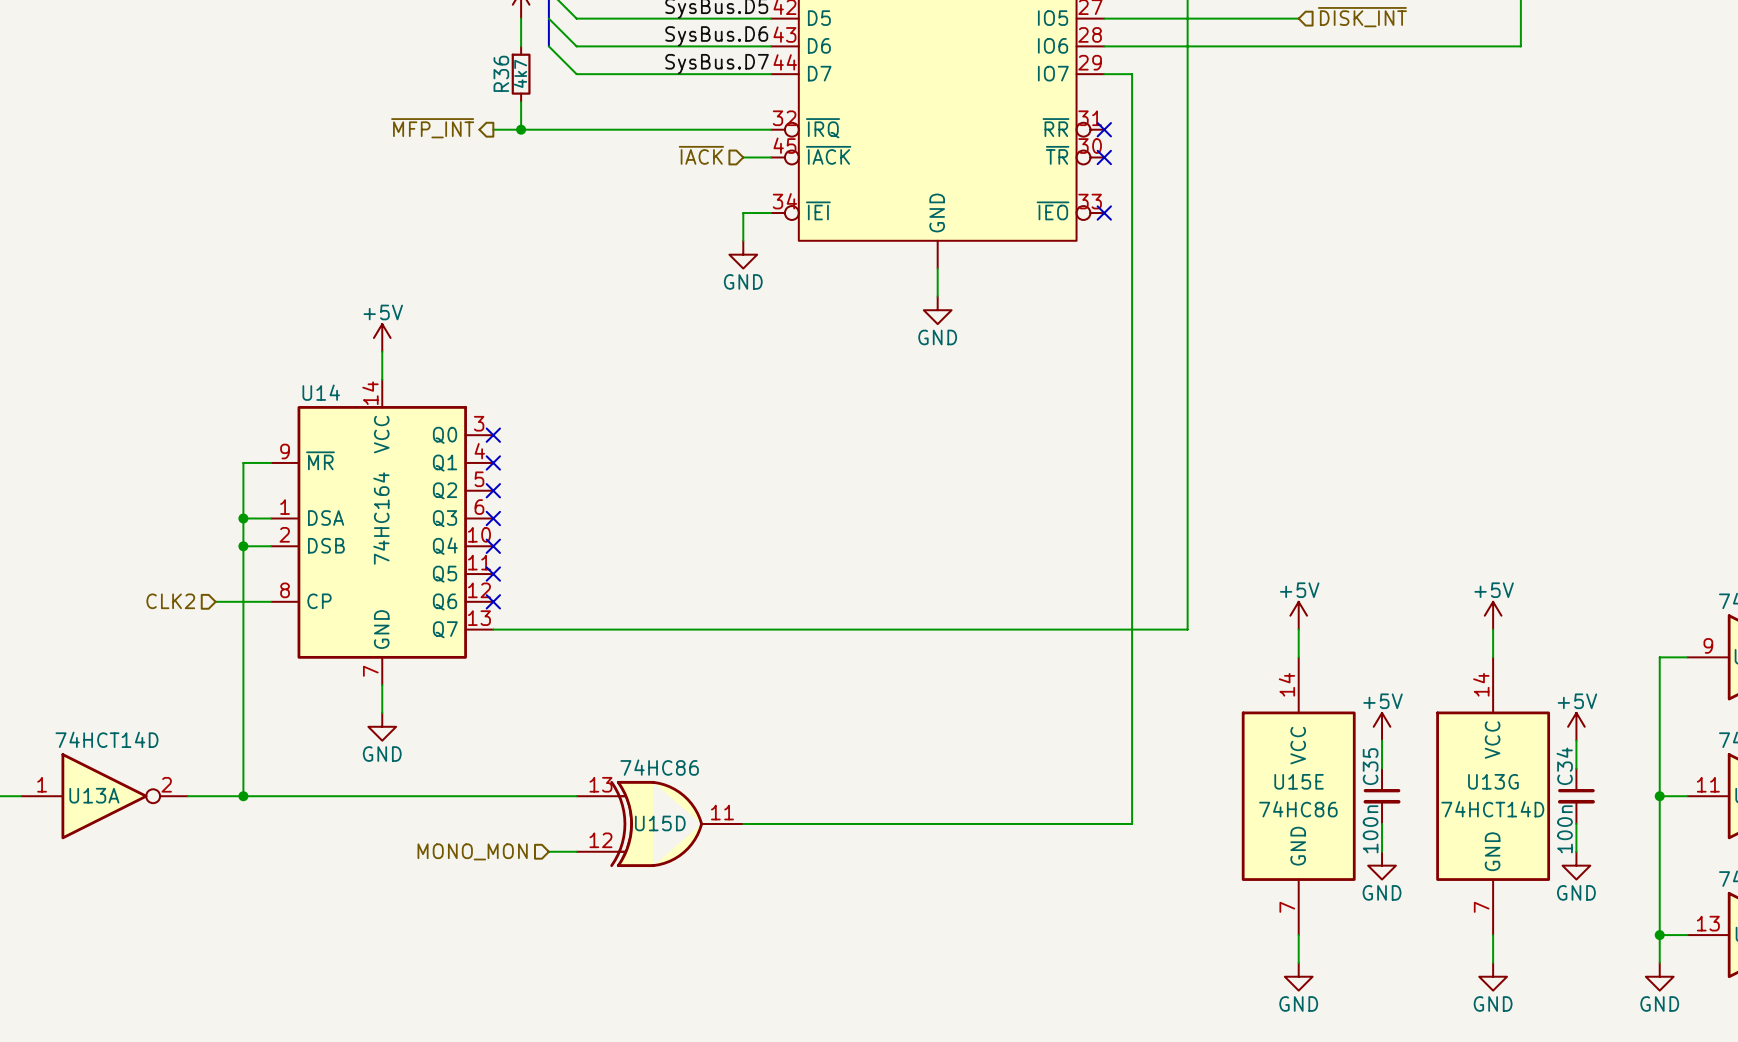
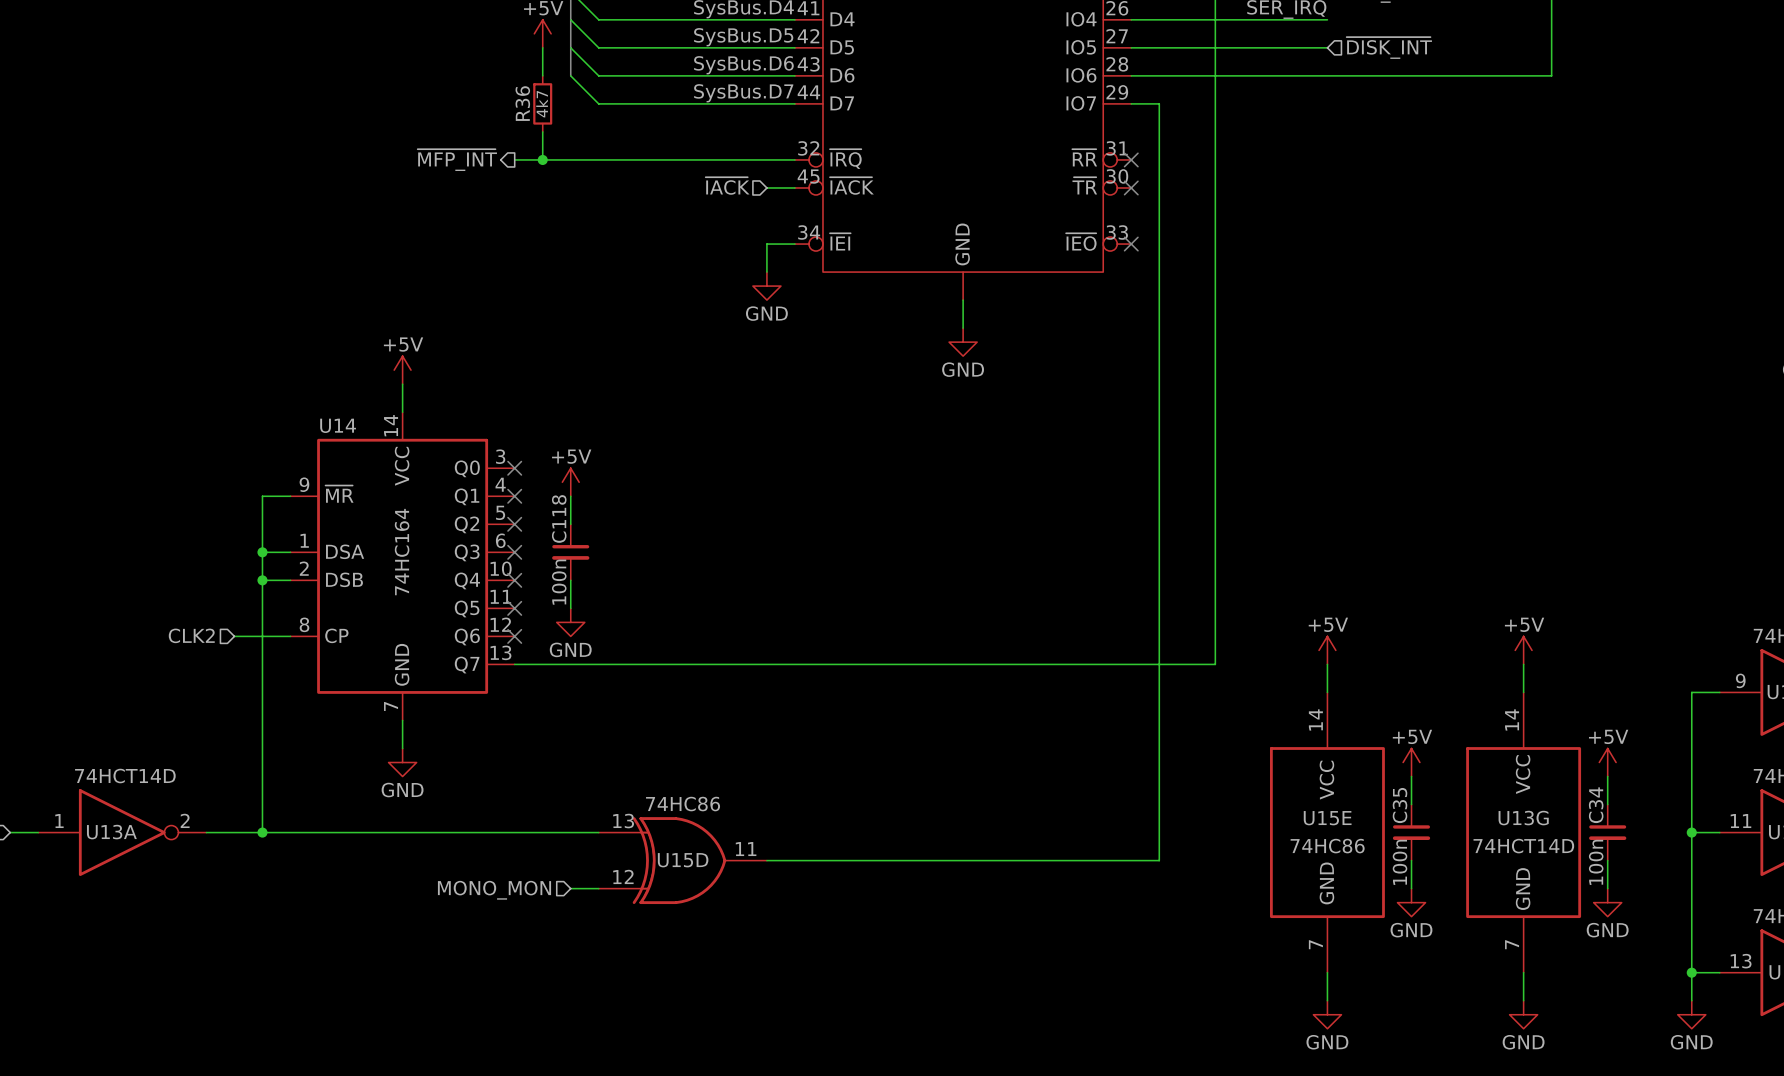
power symbol: none -> +5V (570, 482)
wire: none -> (570, 496) (570, 524)
C118: none -> 100n (570, 552)
wire: none -> (570, 580) (570, 608)
power symbol: none -> GND (570, 622)

